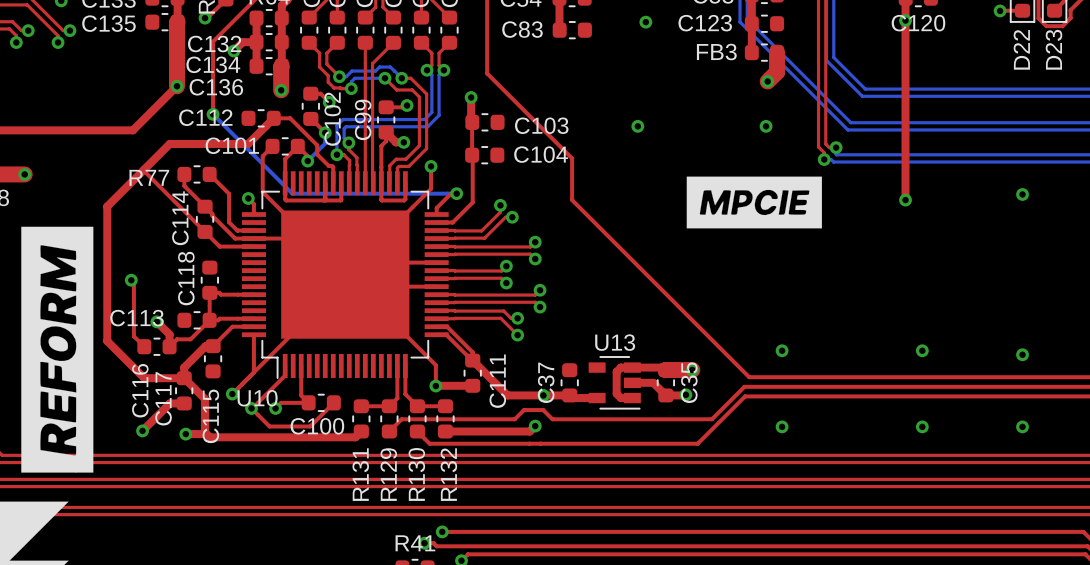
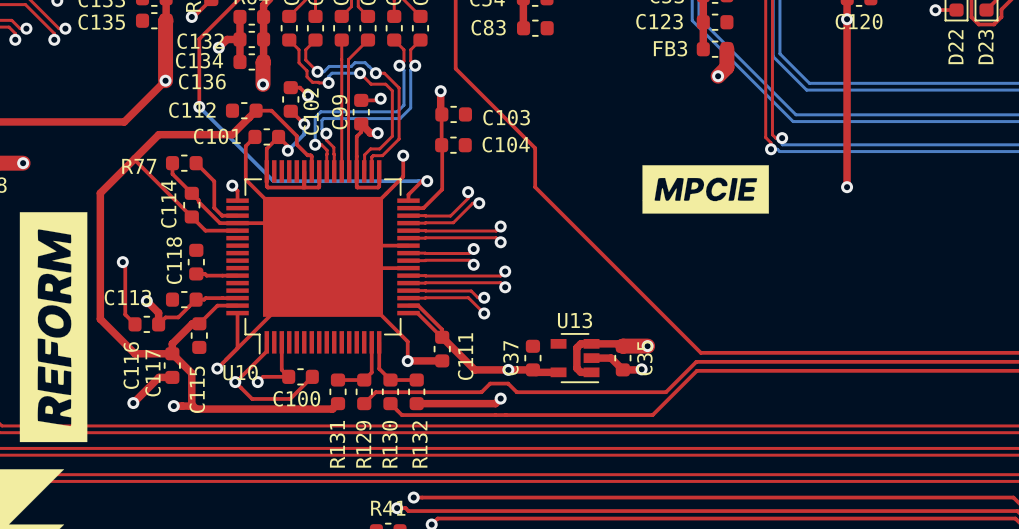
via: (645, 22) -> none
via: (637, 126) -> none
via: (766, 126) -> none
via: (1022, 194) -> none
top track: (209, 293) (209, 320) -> none
via: (782, 350) -> none
via: (922, 350) -> none
via: (1022, 354) -> none
via: (782, 426) -> none
via: (922, 426) -> none
via: (1022, 426) -> none

